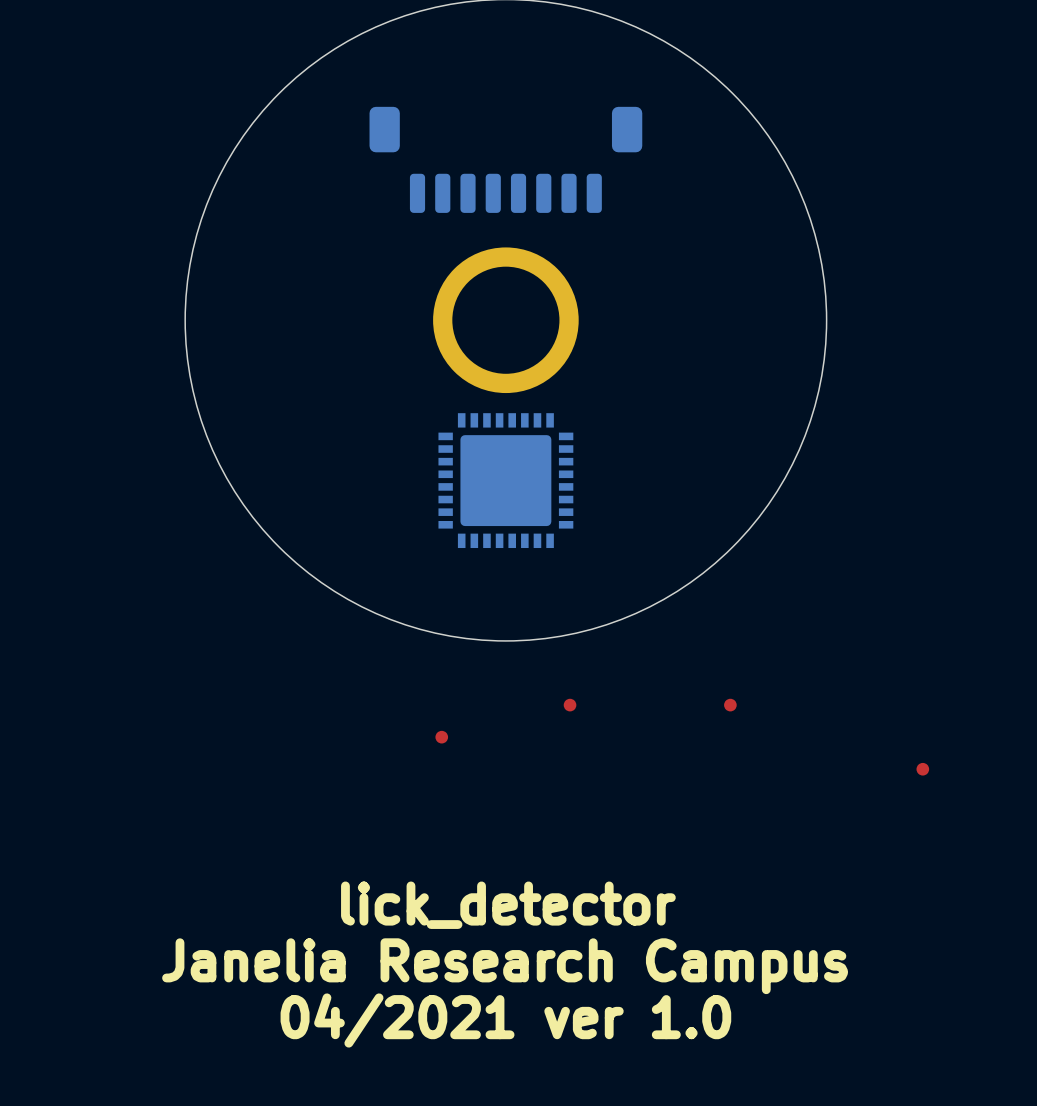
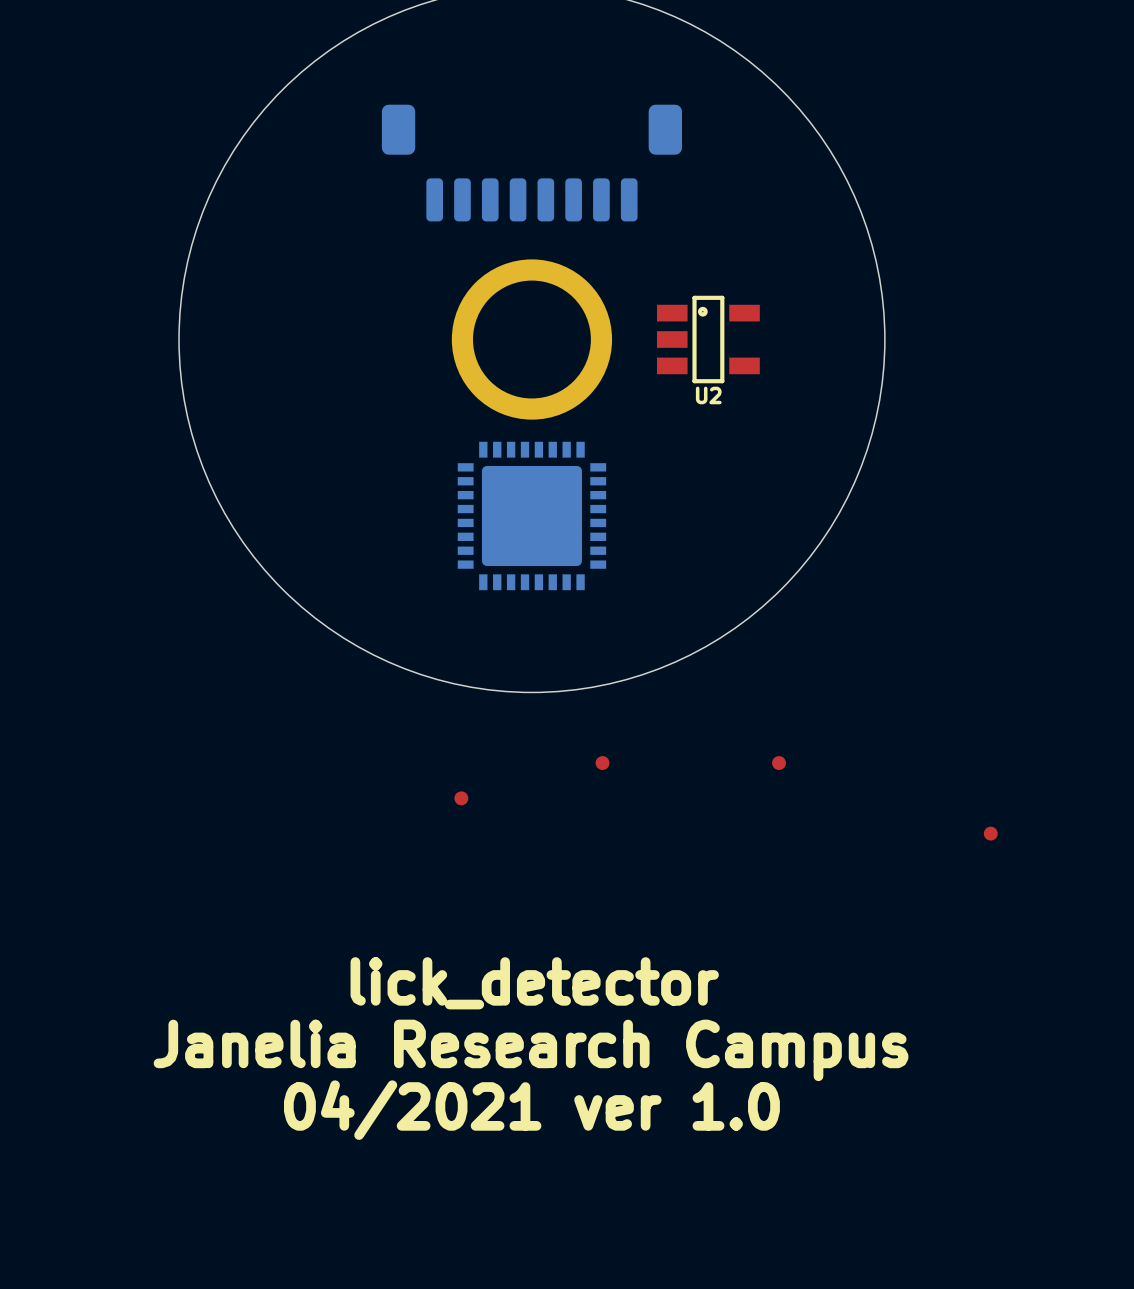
U2: none -> (708, 339)

